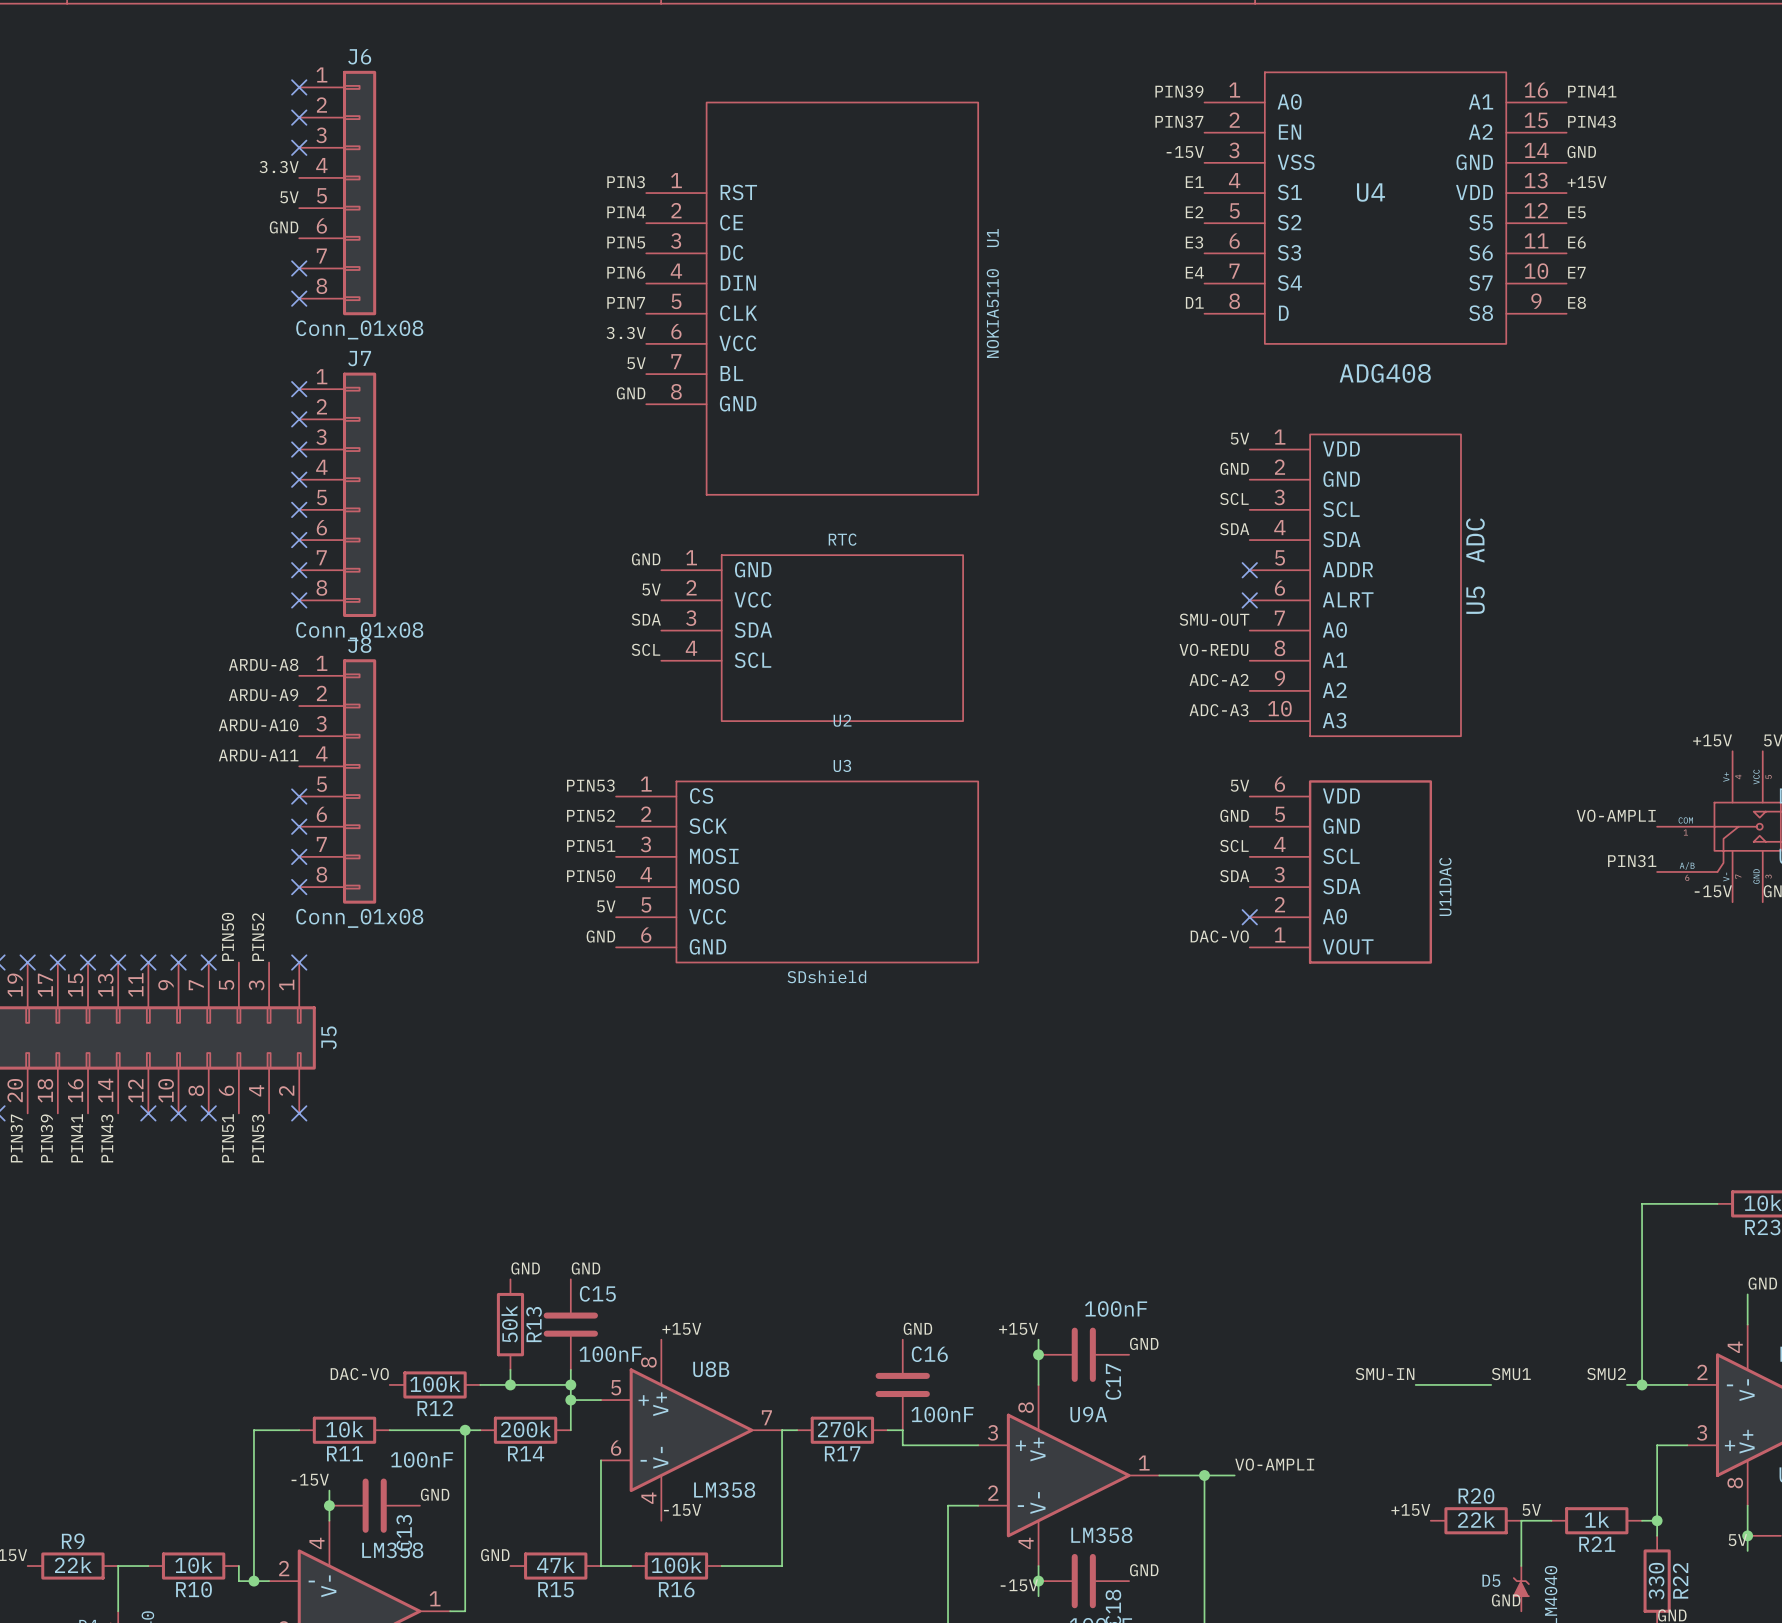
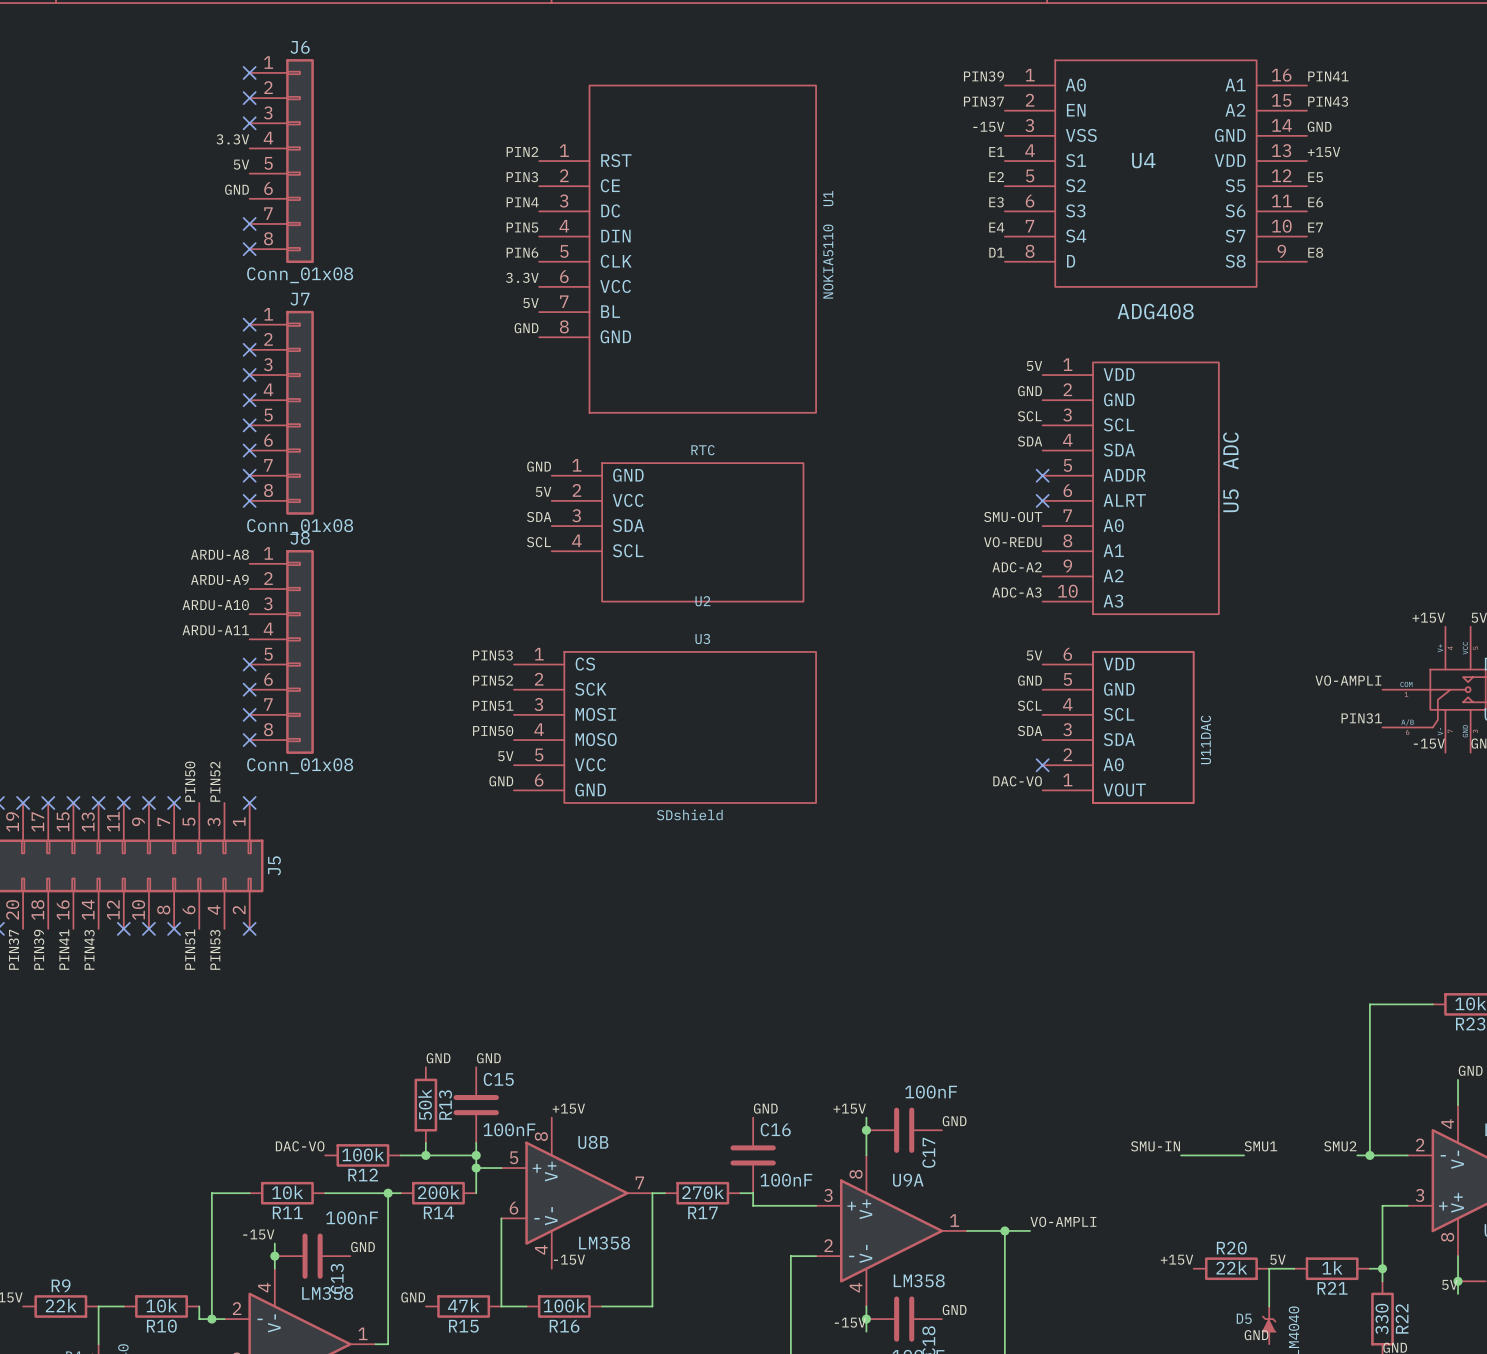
label: PIN3 (626, 182) -> PIN2 (522, 151)
label: PIN4 (626, 212) -> PIN3 (522, 177)
label: PIN5 (626, 242) -> PIN4 (522, 202)
label: PIN6 (626, 272) -> PIN5 (522, 227)
label: PIN7 (626, 302) -> PIN6 (522, 252)

